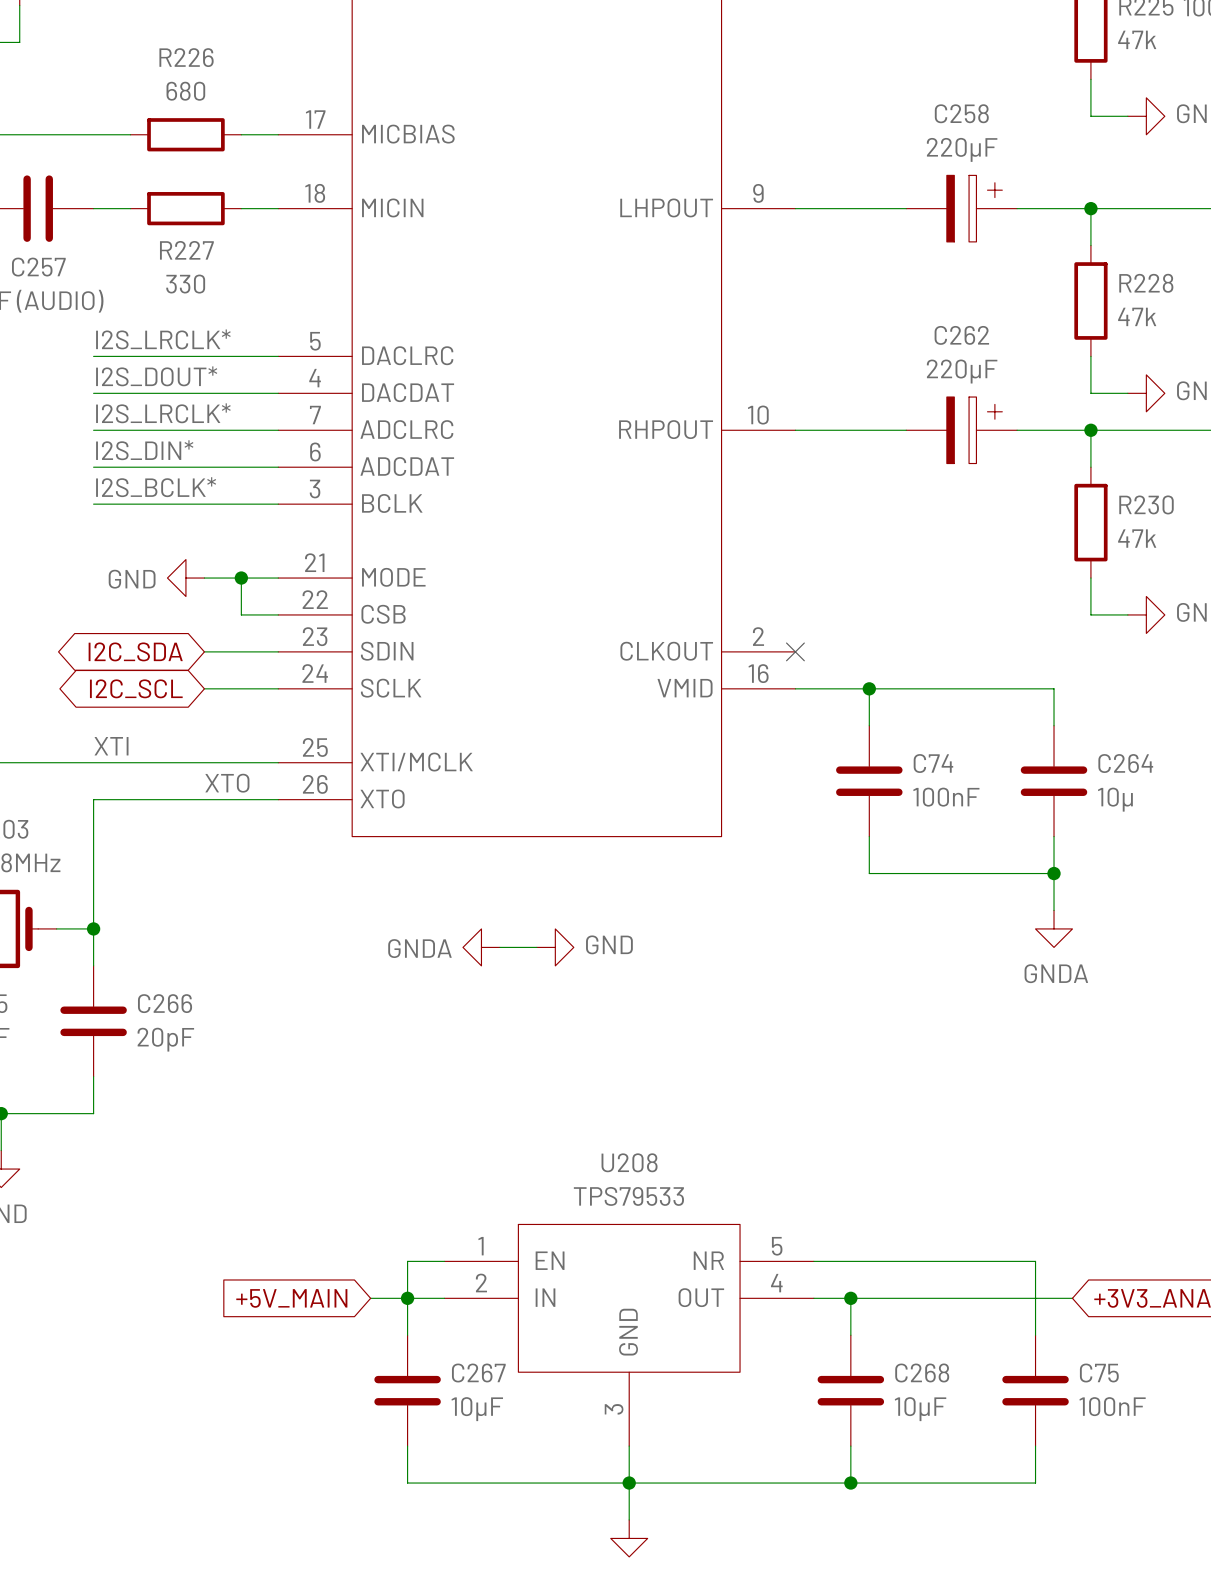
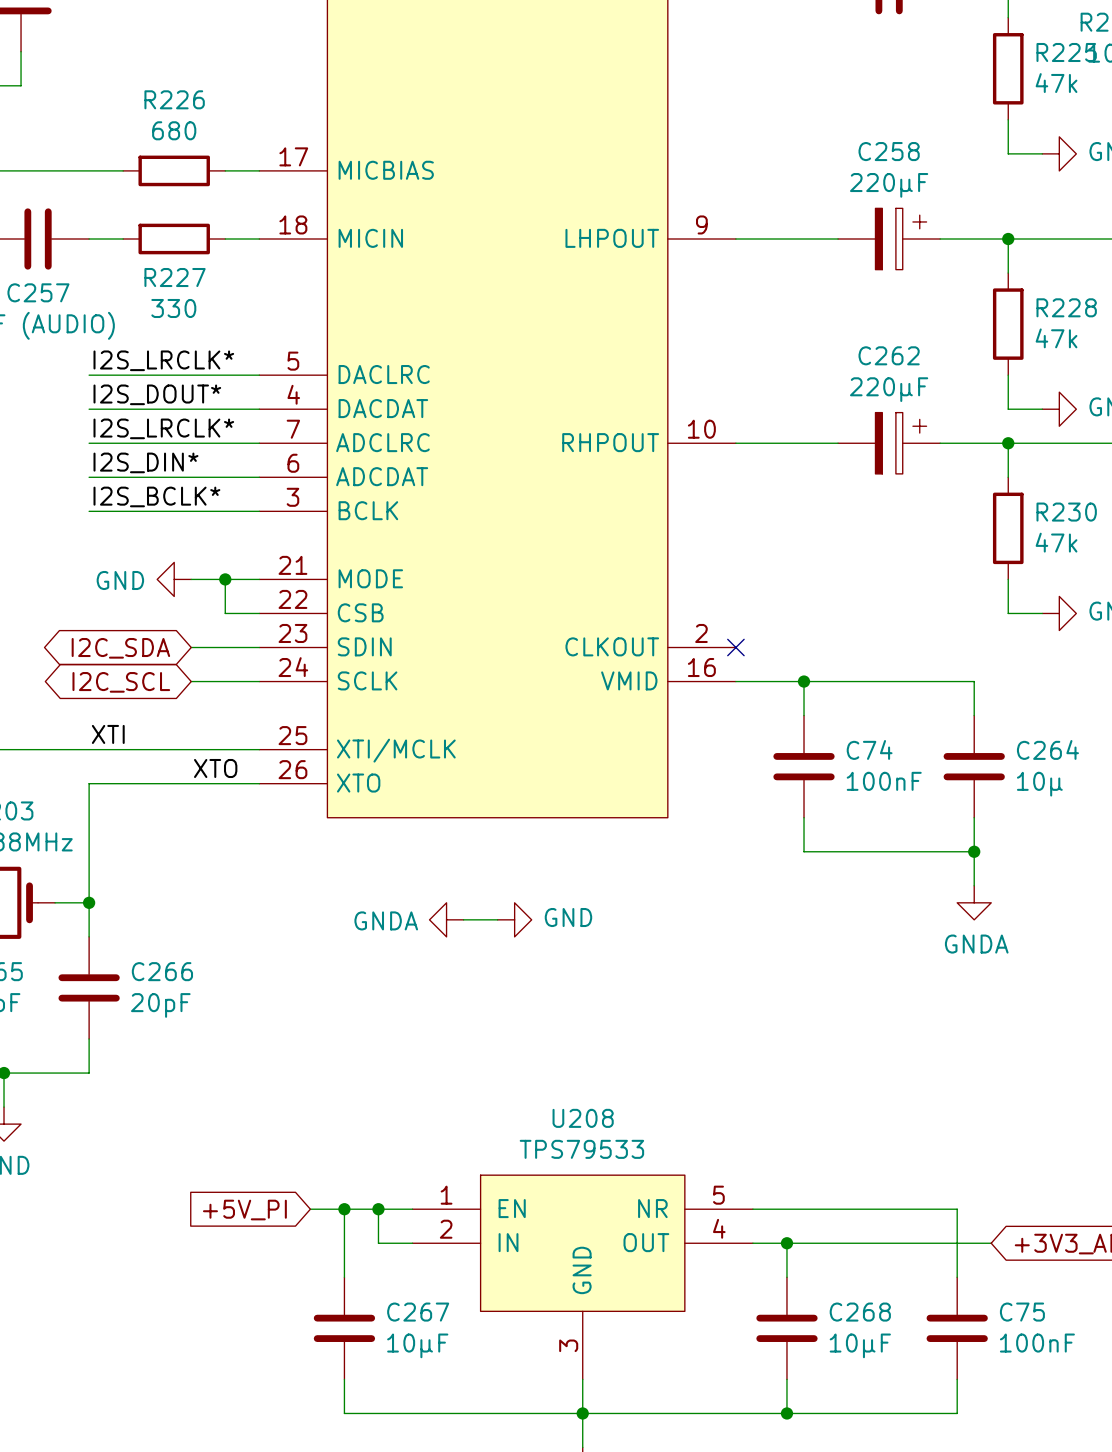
wire: none -> (310, 1209) (378, 1209)
wire: none -> (344, 1209) (344, 1277)
junction: none -> (344, 1209)
junction: none -> (378, 1209)
global label: +5V_MAIN (291, 1298) -> +5V_PI (244, 1210)
wire: (370, 1298) (407, 1298) (407, 1335) -> none
junction: (407, 1298) -> none
C267 position: (407, 1390) -> (344, 1328)
wire: (407, 1446) (407, 1483) -> (344, 1379) (344, 1413) (378, 1413)

